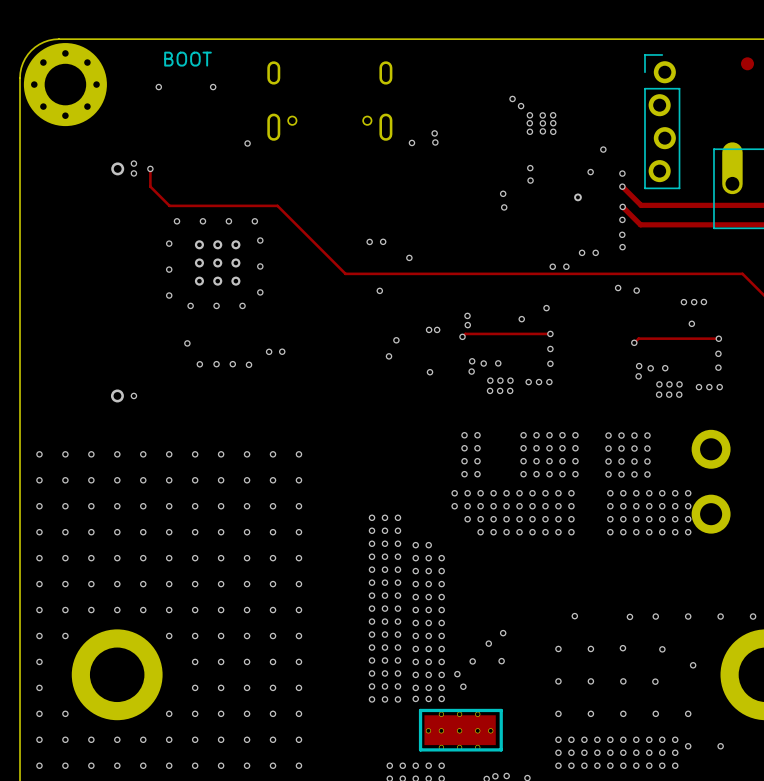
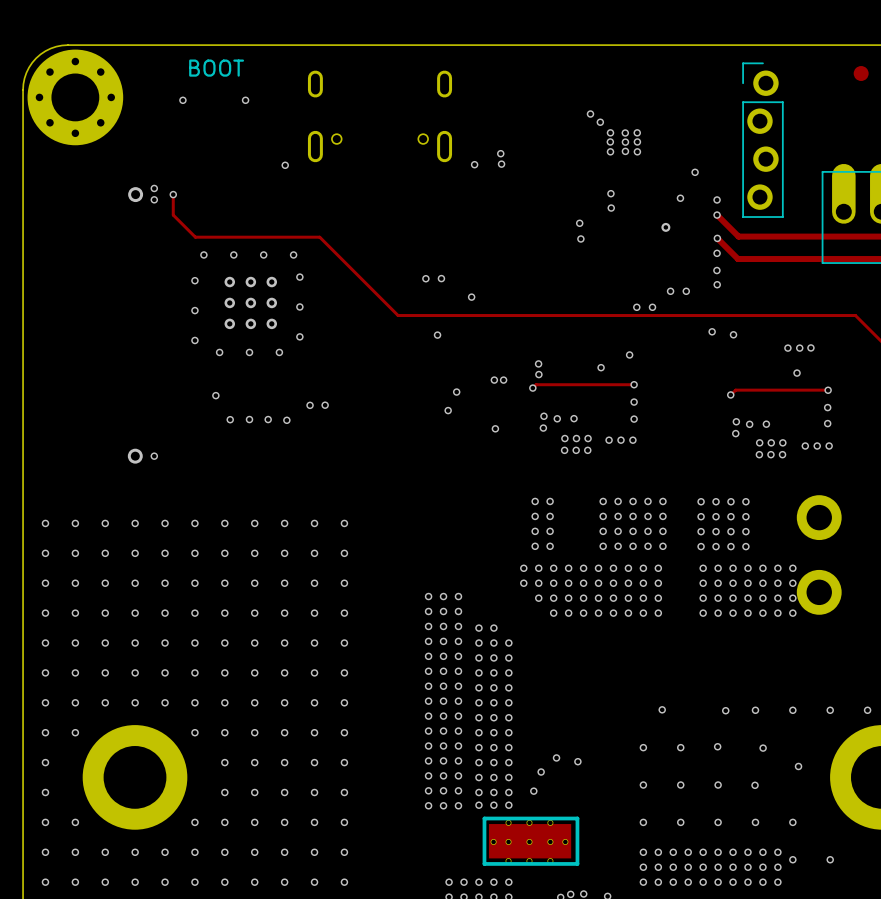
via: (503, 633) -> none
via: (488, 643) -> none
via: none -> (556, 757)
via: (472, 661) -> none
via: none -> (541, 772)
via: (457, 674) -> none

